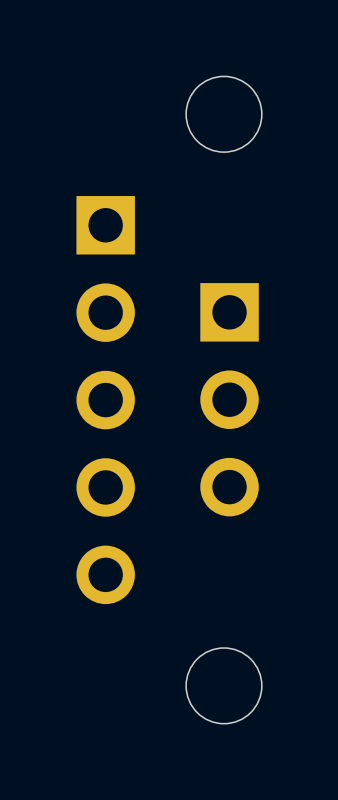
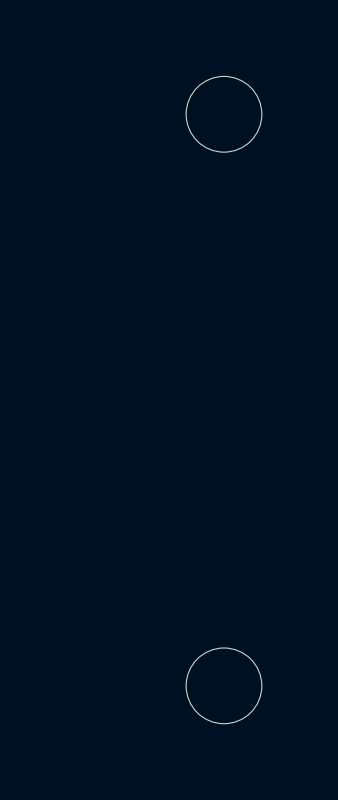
part: (229, 399) -> none
part: (105, 400) -> none

